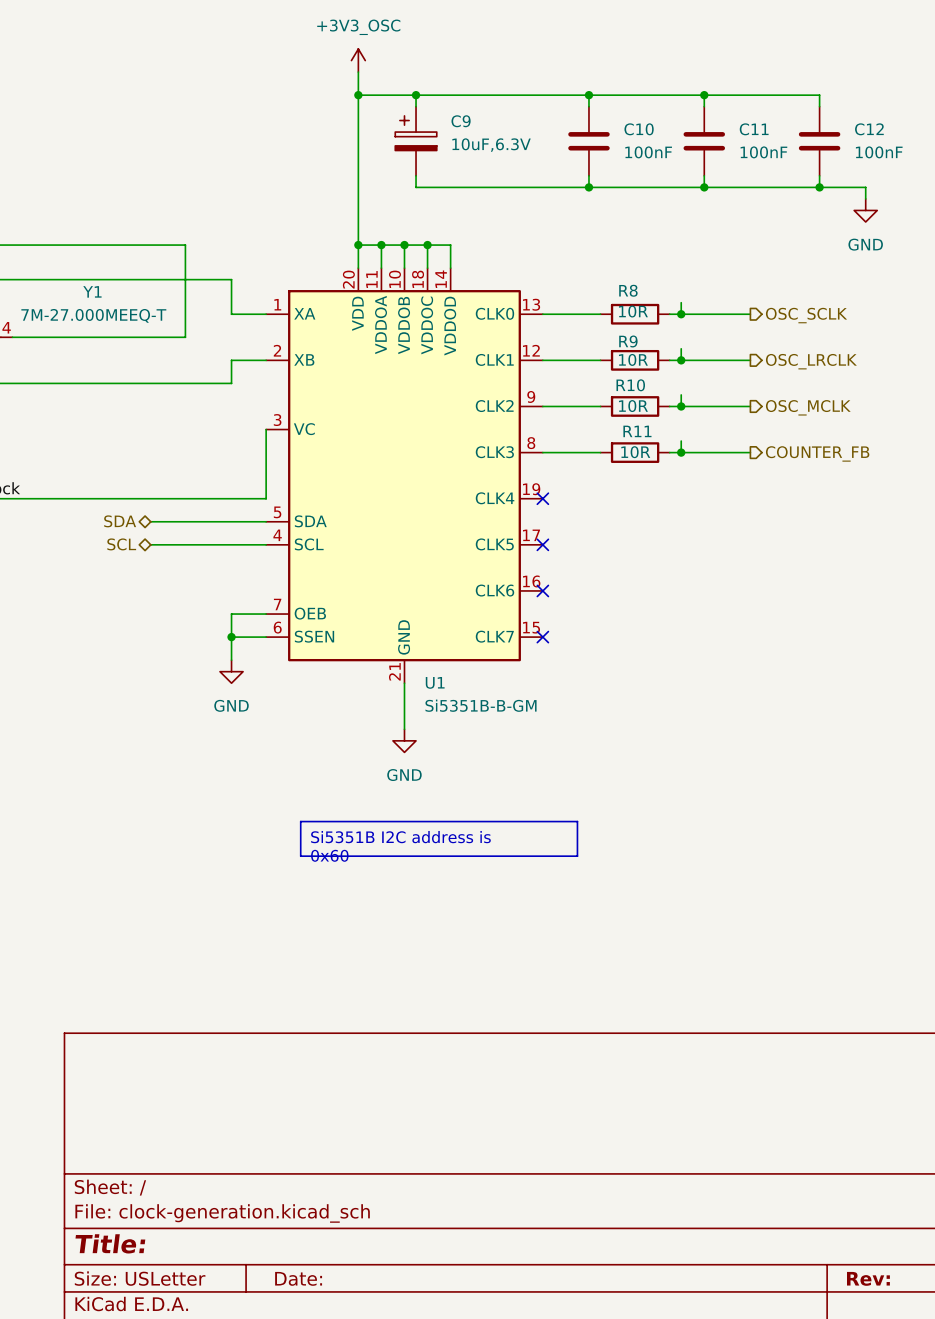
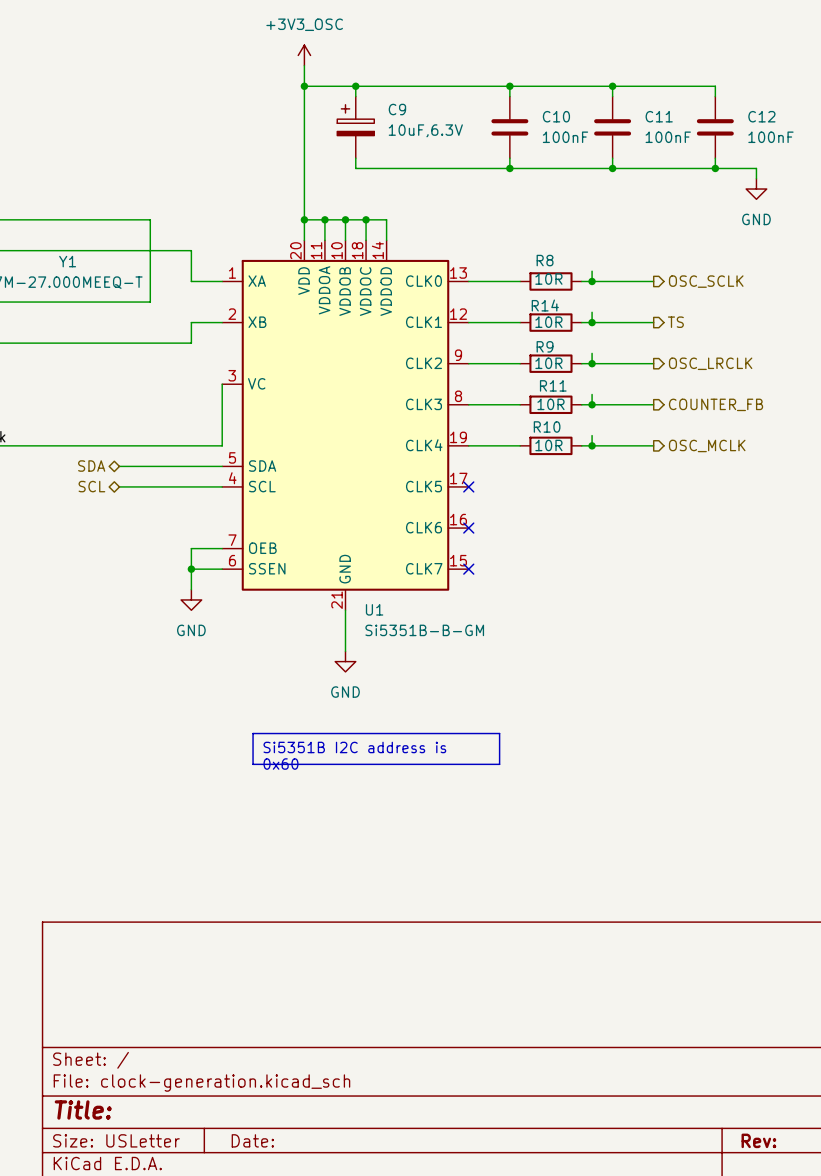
R9 name: R9 (628, 341) -> R14 (545, 305)
hierarchical label: OSC_LRCLK (811, 361) -> TS (675, 322)
R10 name: R10 (630, 385) -> R9 (545, 346)
hierarchical label: OSC_MCLK (808, 407) -> OSC_LRCLK (710, 363)
wire: none -> (592, 435) (592, 445)
wire: none -> (468, 445) (520, 445)
no-connect mark: (542, 498) -> none
R10: none -> 10R (550, 445)
wire: none -> (581, 445) (653, 445)
junction: none -> (592, 445)
hierarchical label: none -> OSC_MCLK (707, 445)

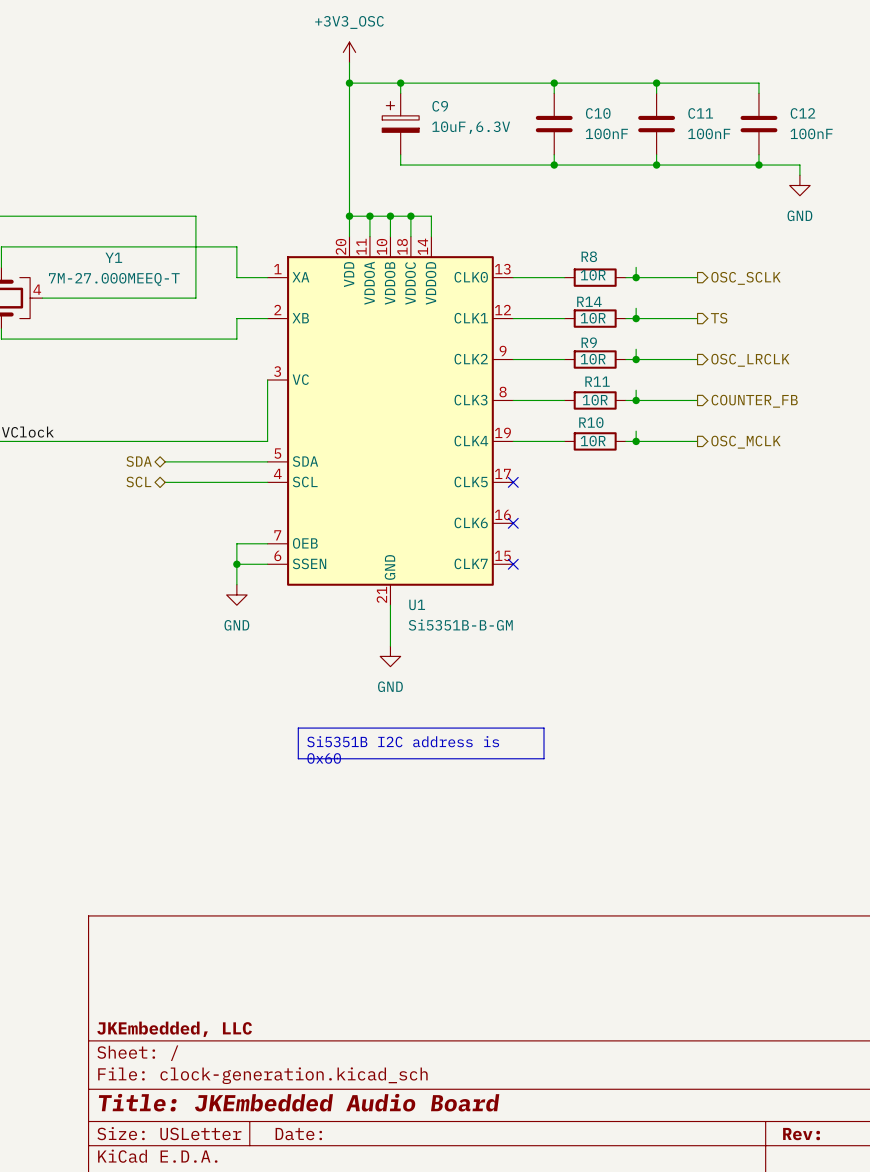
title block: none -> JKEmbedded, LLC (174, 1029)
title block: Title: (83, 1109) -> Title: JKEmbedded Audio Board (299, 1102)

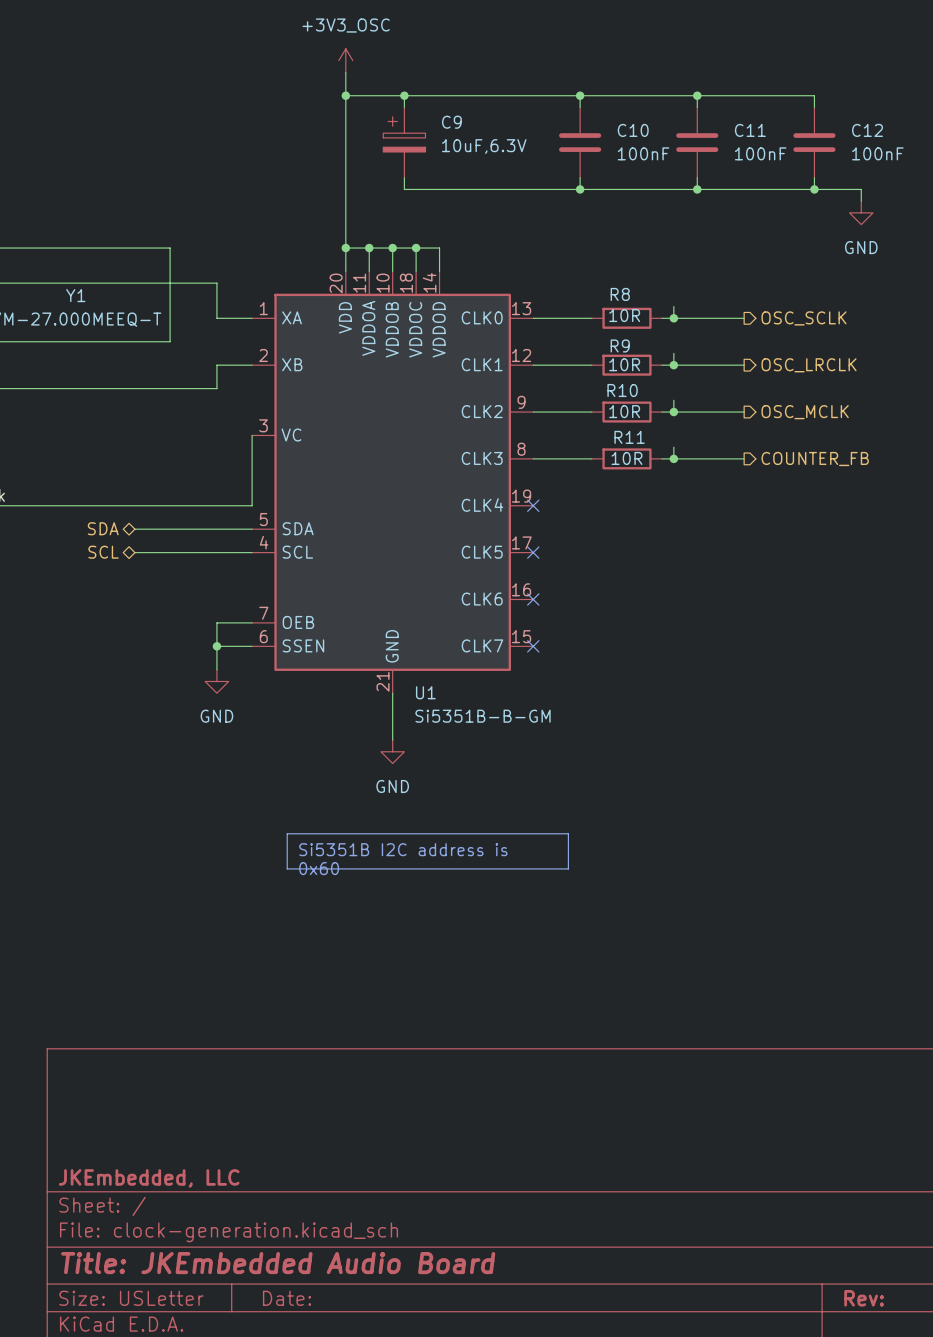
R14 name: R14 (589, 301) -> R9 (620, 345)
hierarchical label: TS (719, 318) -> OSC_LRCLK (809, 365)
R9 name: R9 (589, 342) -> R10 (622, 390)
hierarchical label: OSC_LRCLK (750, 360) -> OSC_MCLK (805, 412)
wire: (636, 431) (636, 441) -> none
wire: (513, 441) (564, 441) -> none
no-connect mark: none -> (533, 505)
R10: 10R (595, 441) -> none
wire: (625, 441) (697, 441) -> none
junction: (636, 441) -> none
hierarchical label: OSC_MCLK (746, 442) -> none

